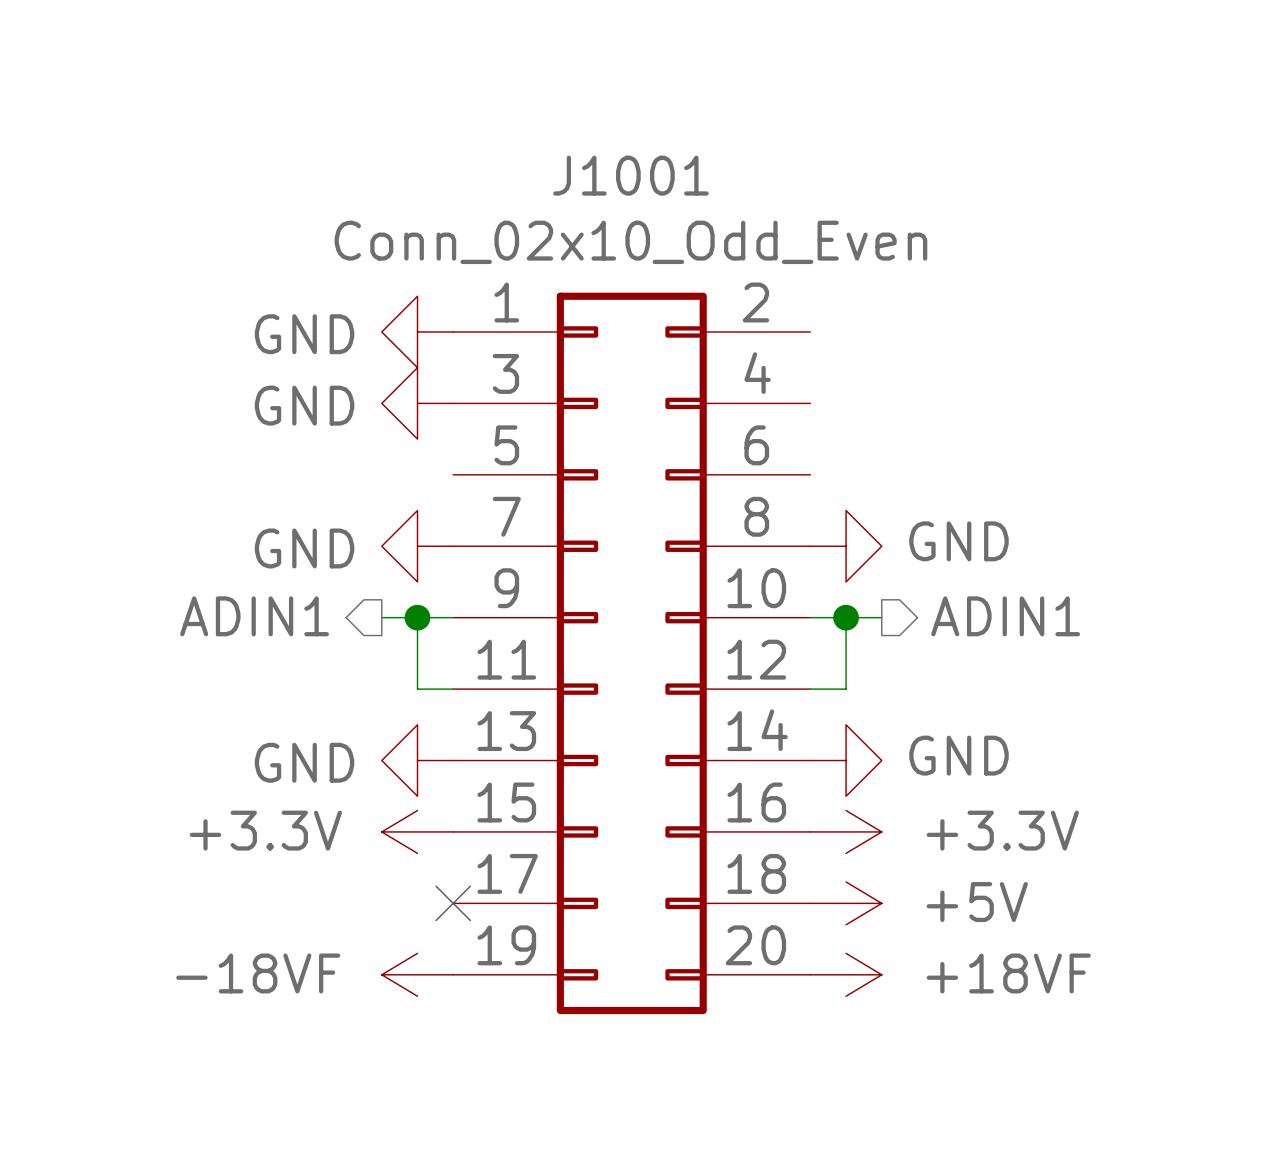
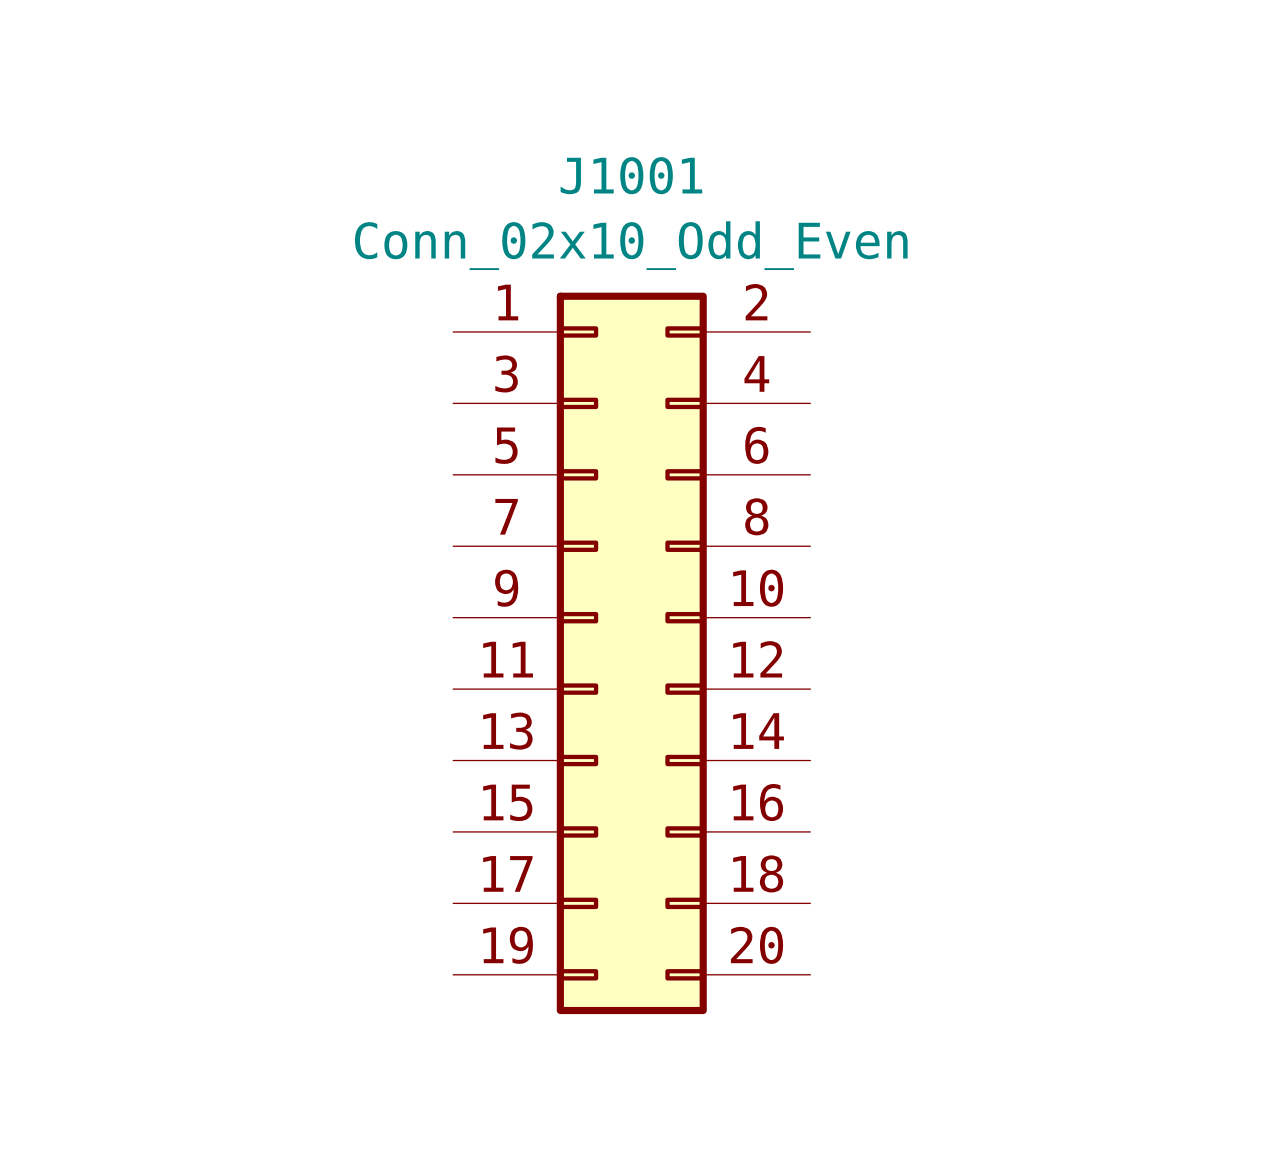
power symbol: GND (417, 331) -> none
power symbol: GND (417, 403) -> none
power symbol: GND (417, 546) -> none
power symbol: GND (846, 546) -> none
hierarchical label: ADIN1 (254, 616) -> none
hierarchical label: ADIN1 (1005, 616) -> none
wire: (381, 617) (453, 617) -> none
wire: (417, 617) (417, 689) (453, 689) -> none
junction: (417, 617) -> none
wire: (810, 617) (881, 617) -> none
wire: (846, 617) (846, 689) (810, 689) -> none
junction: (846, 617) -> none
power symbol: GND (417, 760) -> none
power symbol: GND (846, 760) -> none
power symbol: +3.3V (417, 831) -> none
power symbol: +3.3V (846, 831) -> none
no-connect mark: (453, 903) -> none
power symbol: +5V (846, 903) -> none
power symbol: -18VF (417, 974) -> none
power symbol: +18VF (846, 974) -> none

